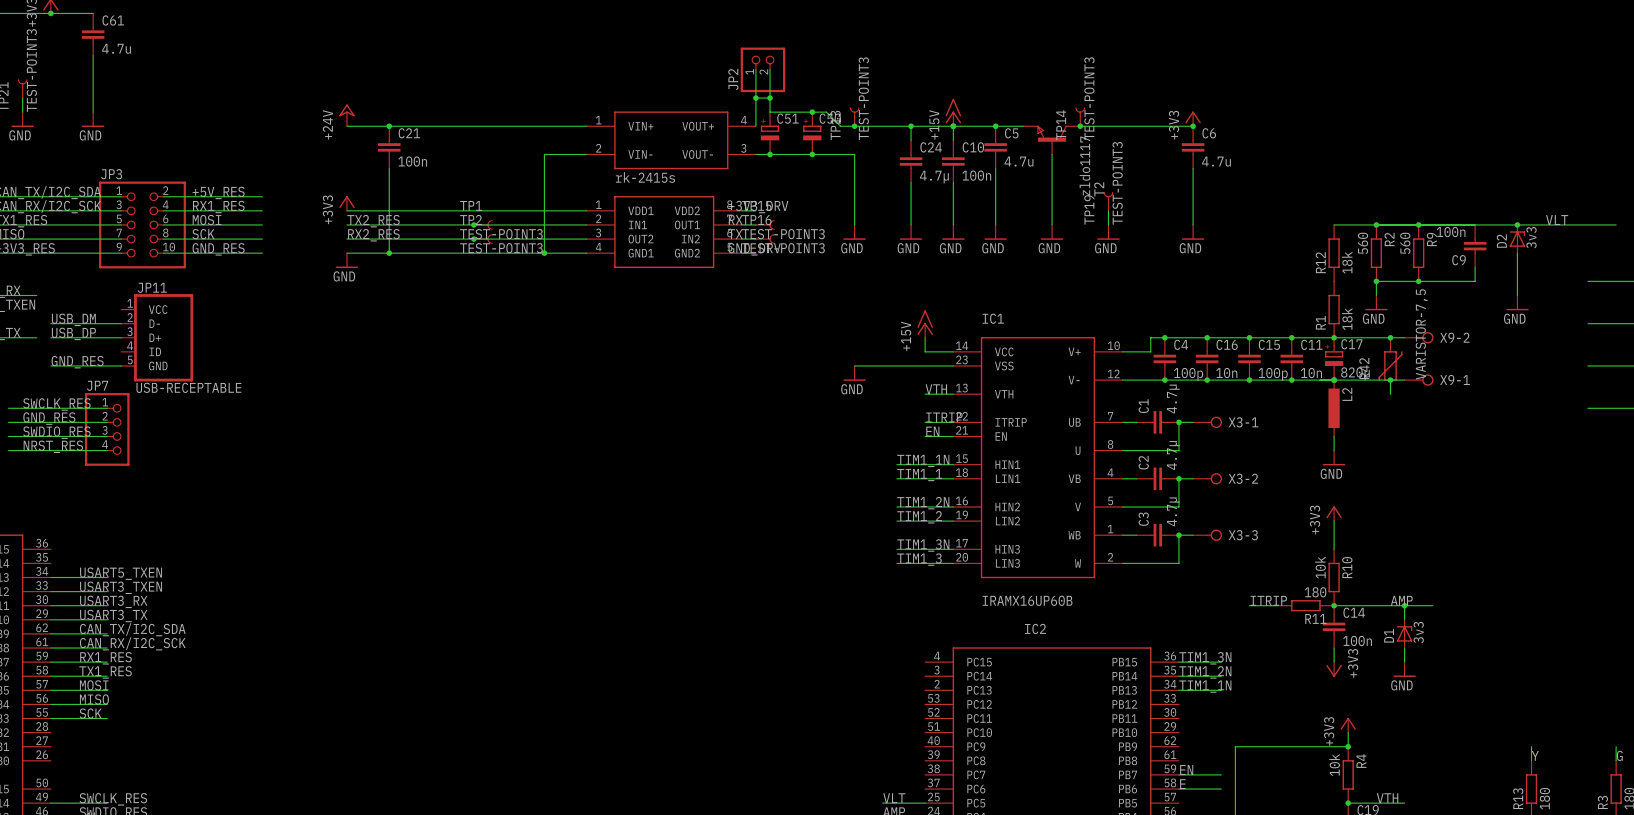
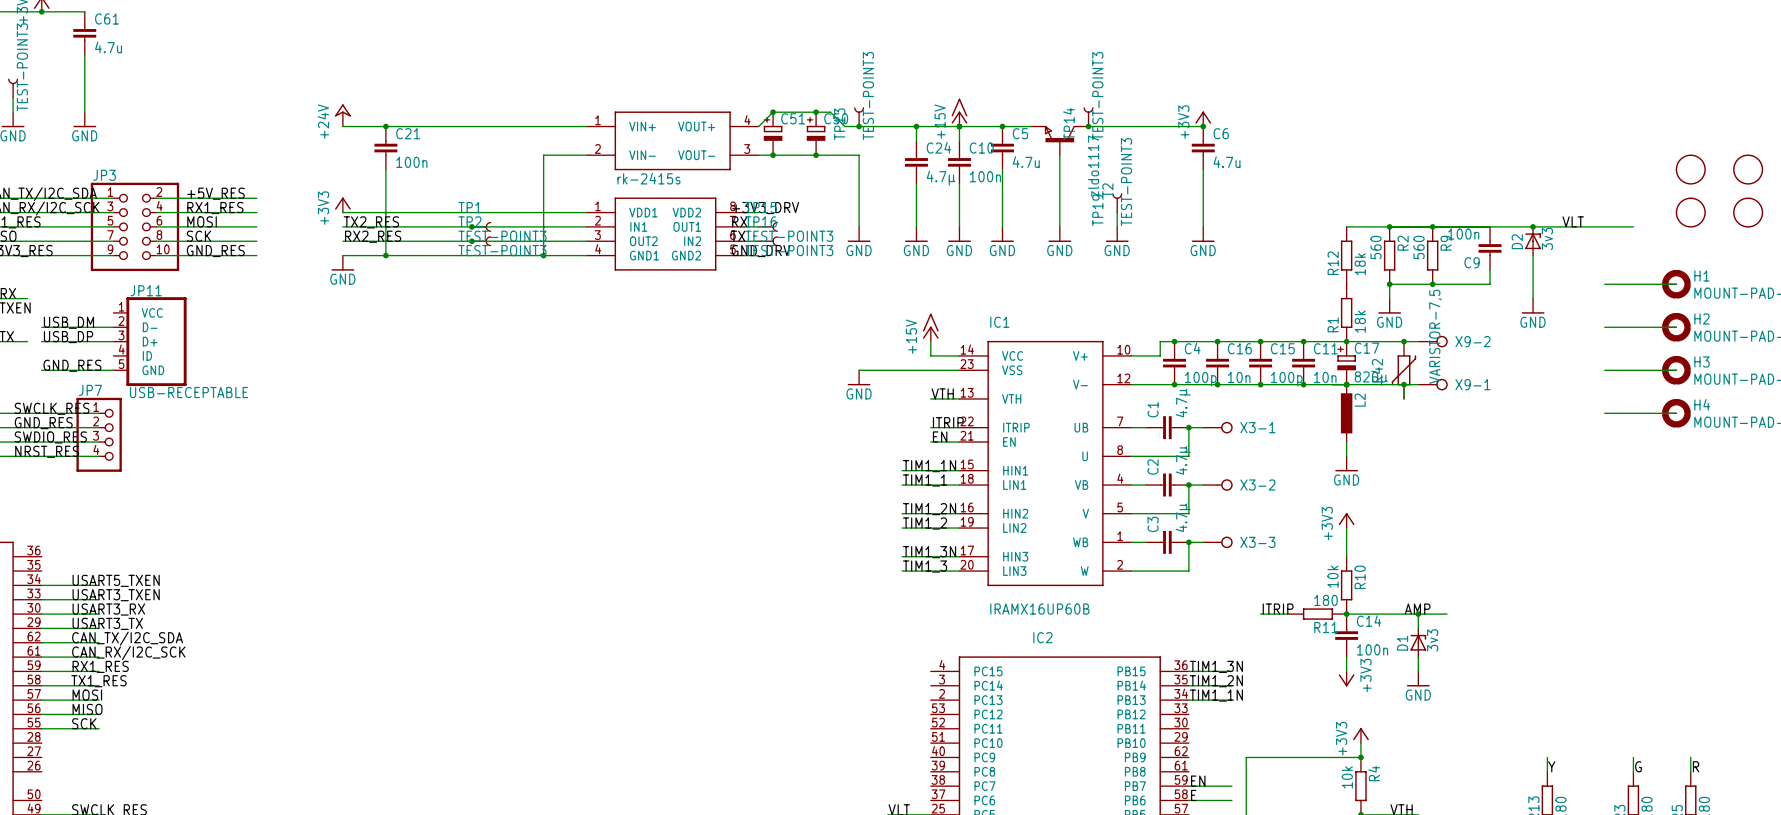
wire: (755, 69) (755, 126) -> (773, 112) (758, 126)
JP2: (762, 69) -> none
wire: (770, 69) (770, 112) -> none
wire: (755, 98) (770, 98) -> none
junction: (755, 98) -> none
junction: (770, 98) -> none
junction: none -> (773, 112)

